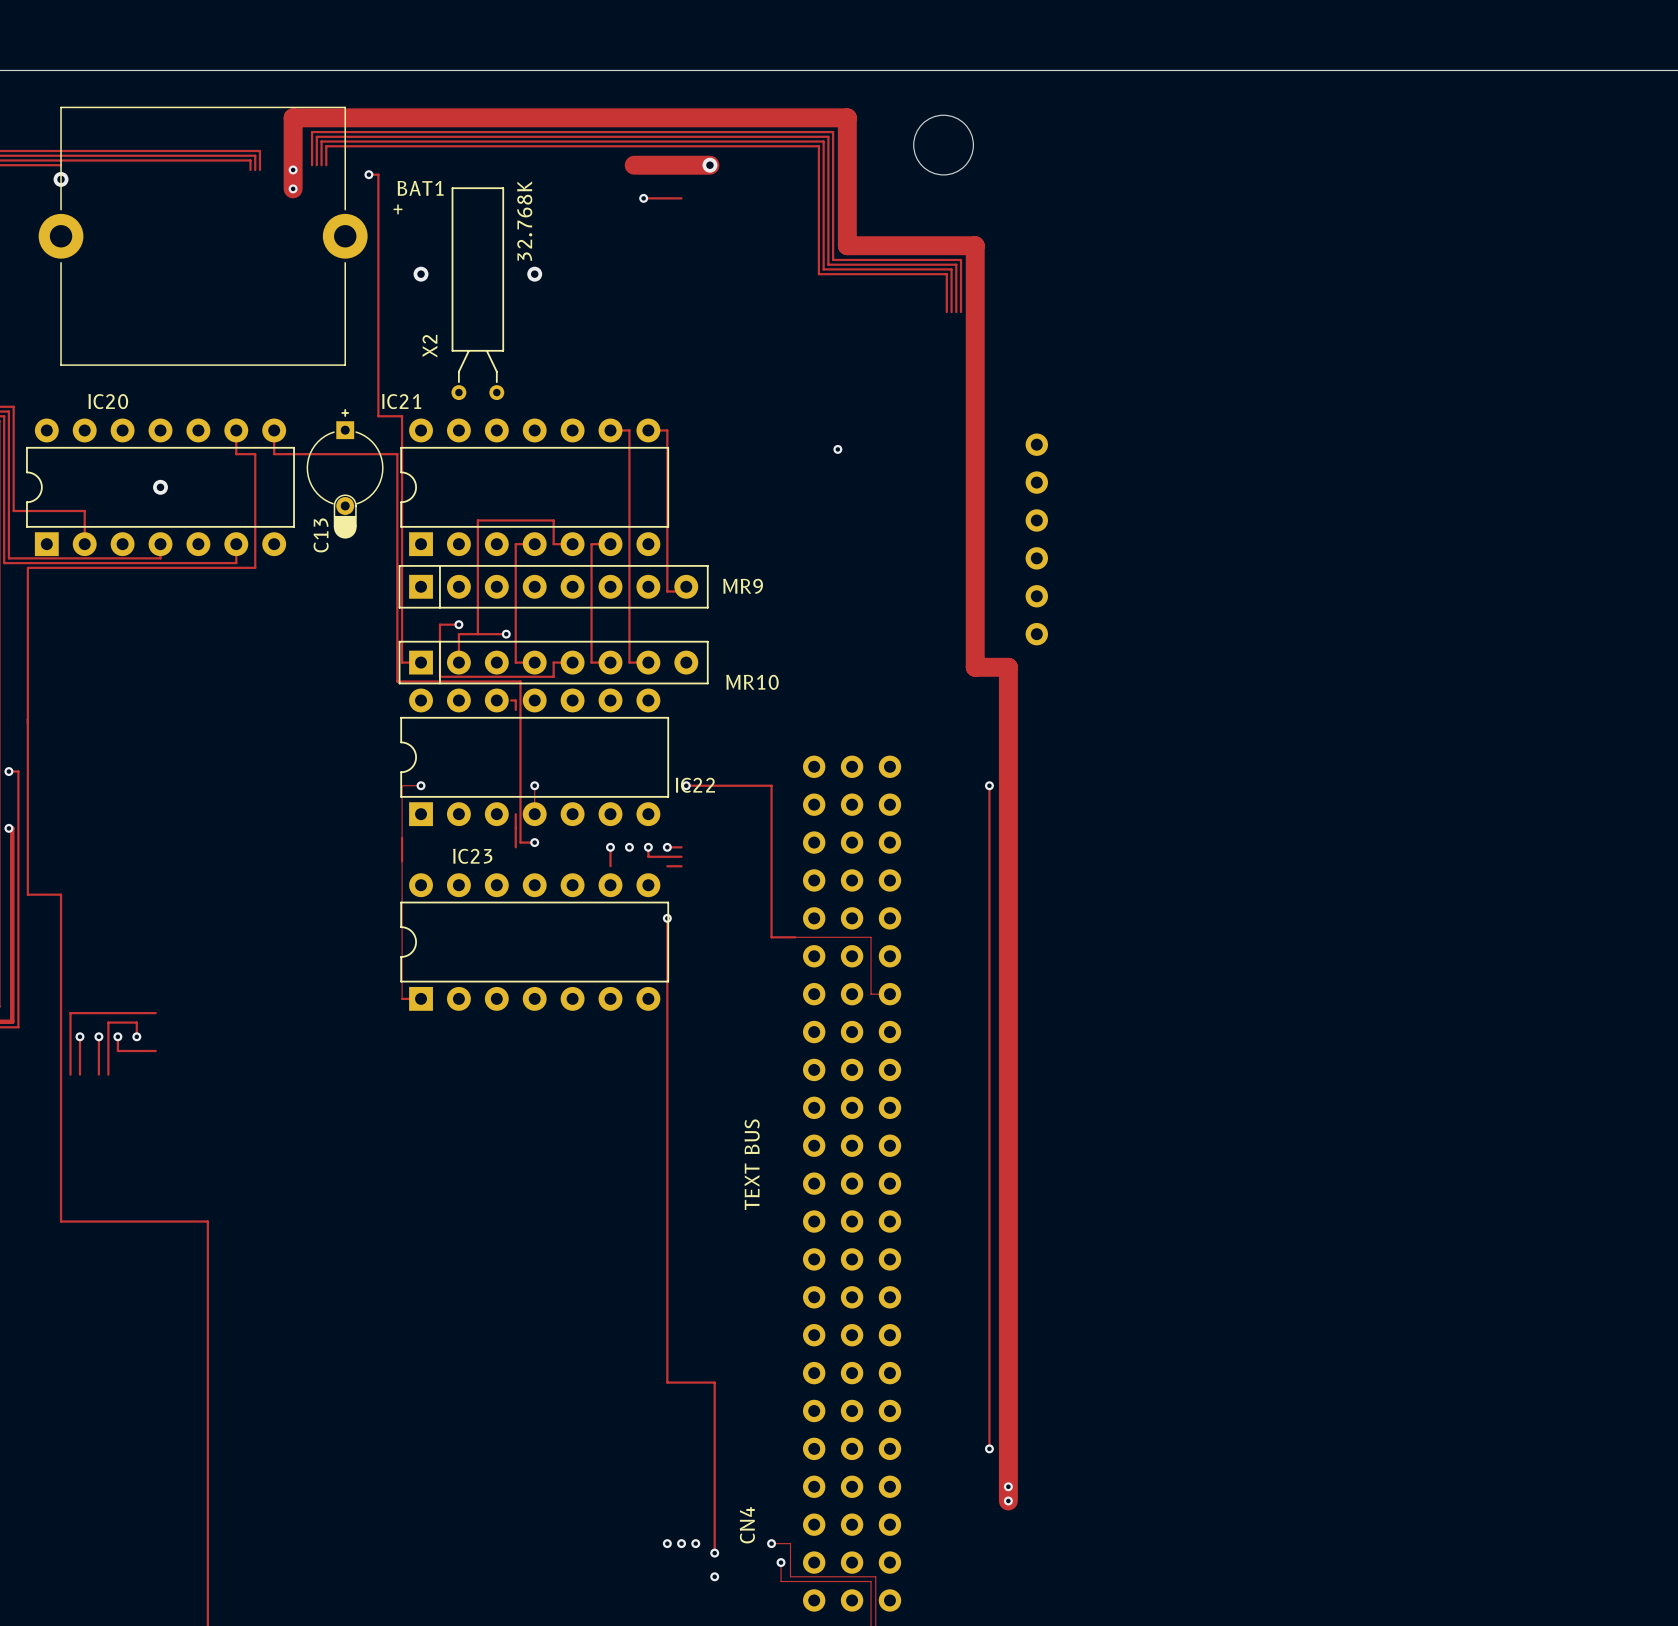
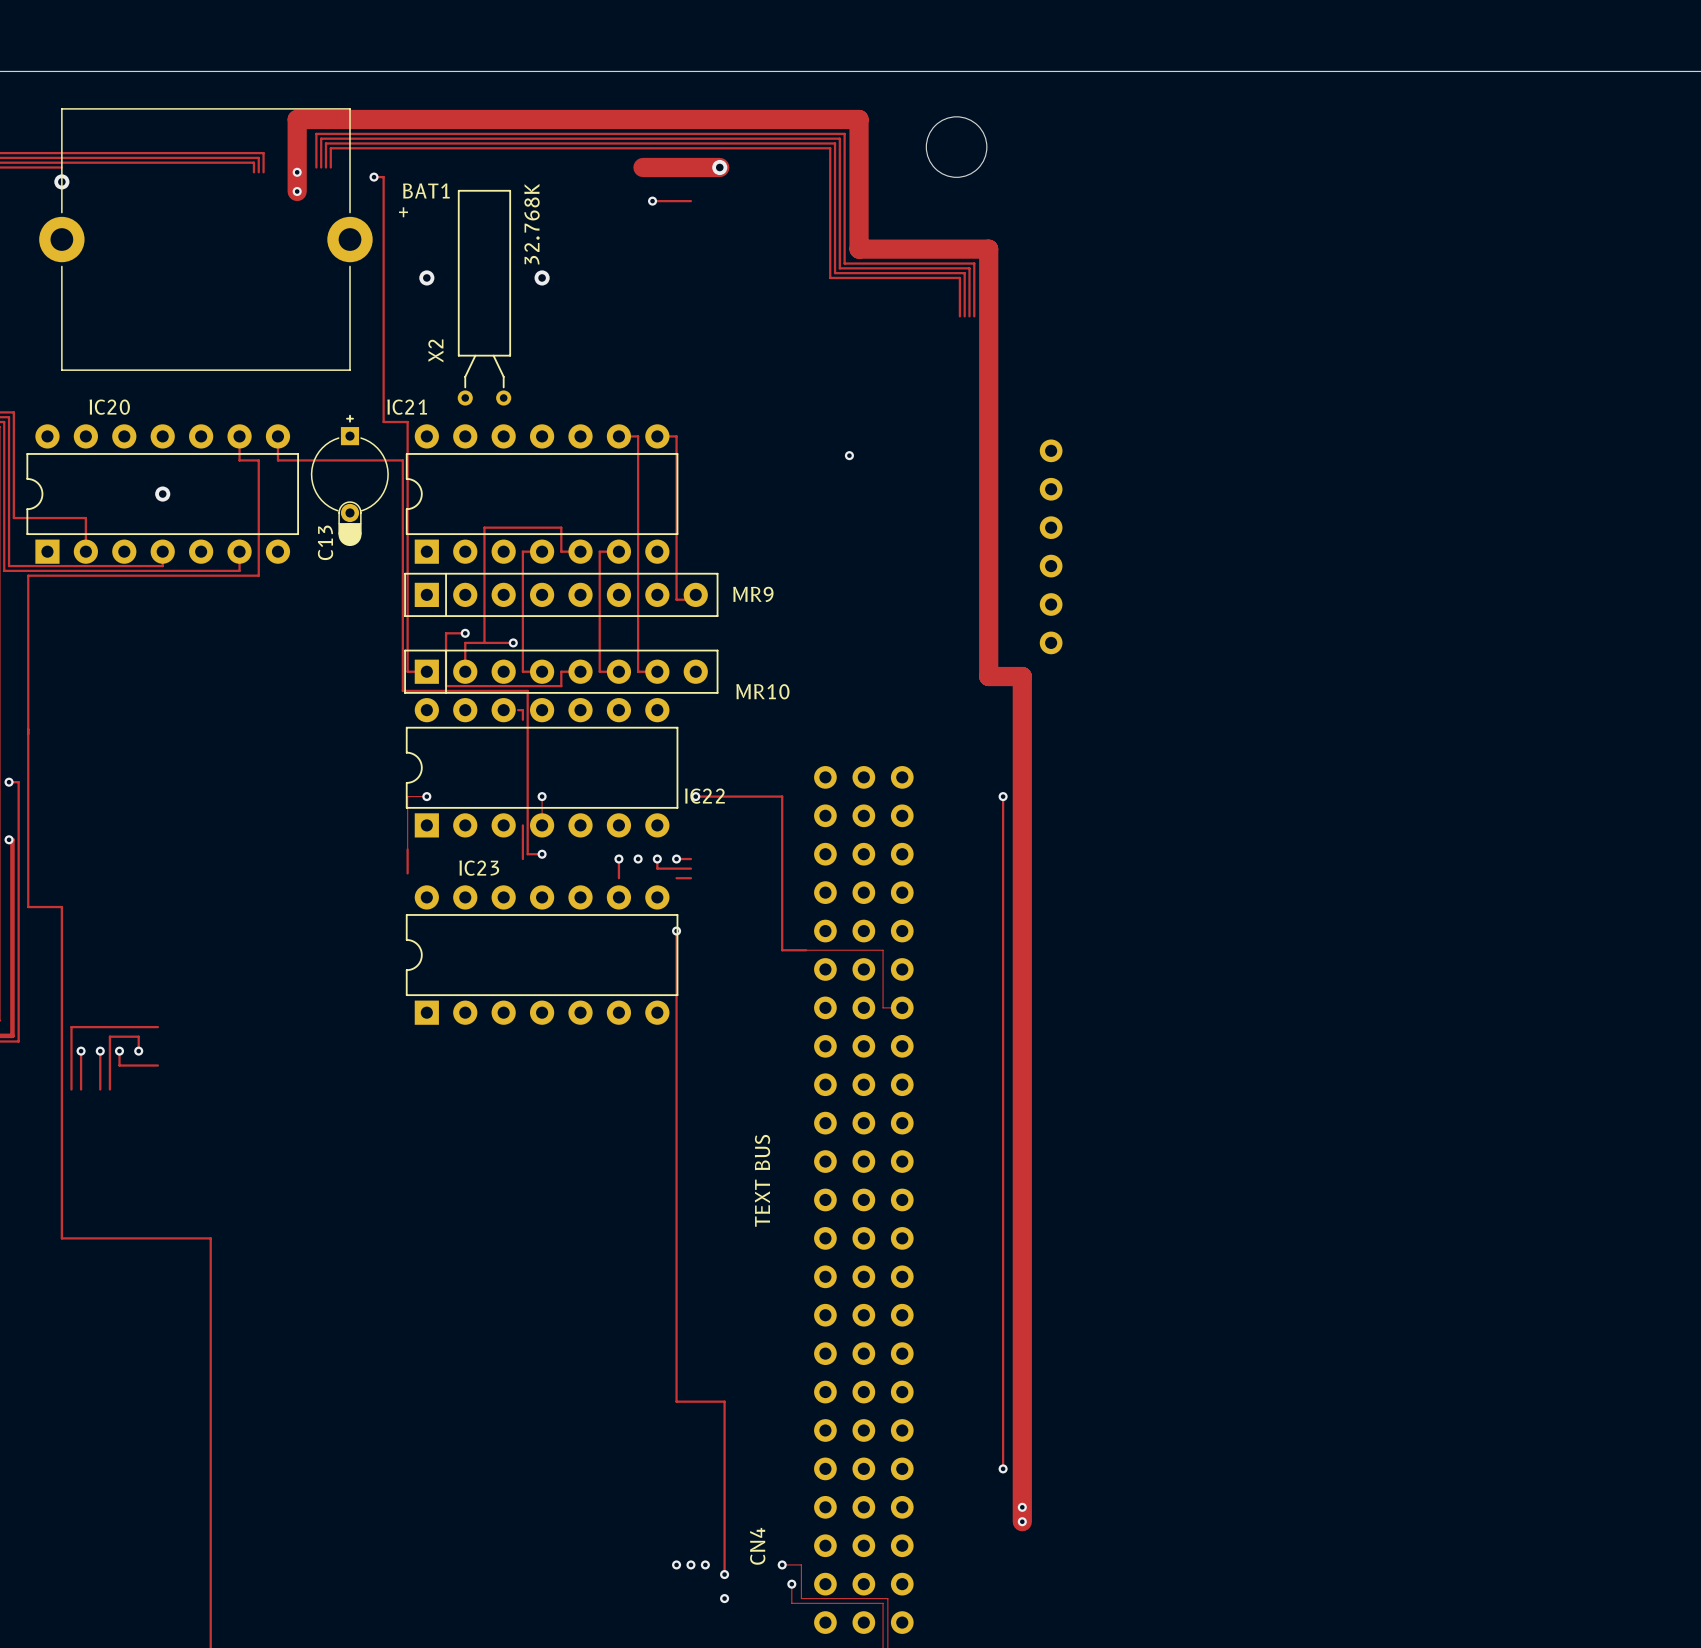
track: (402, 861) (402, 998) (421, 998) -> none

